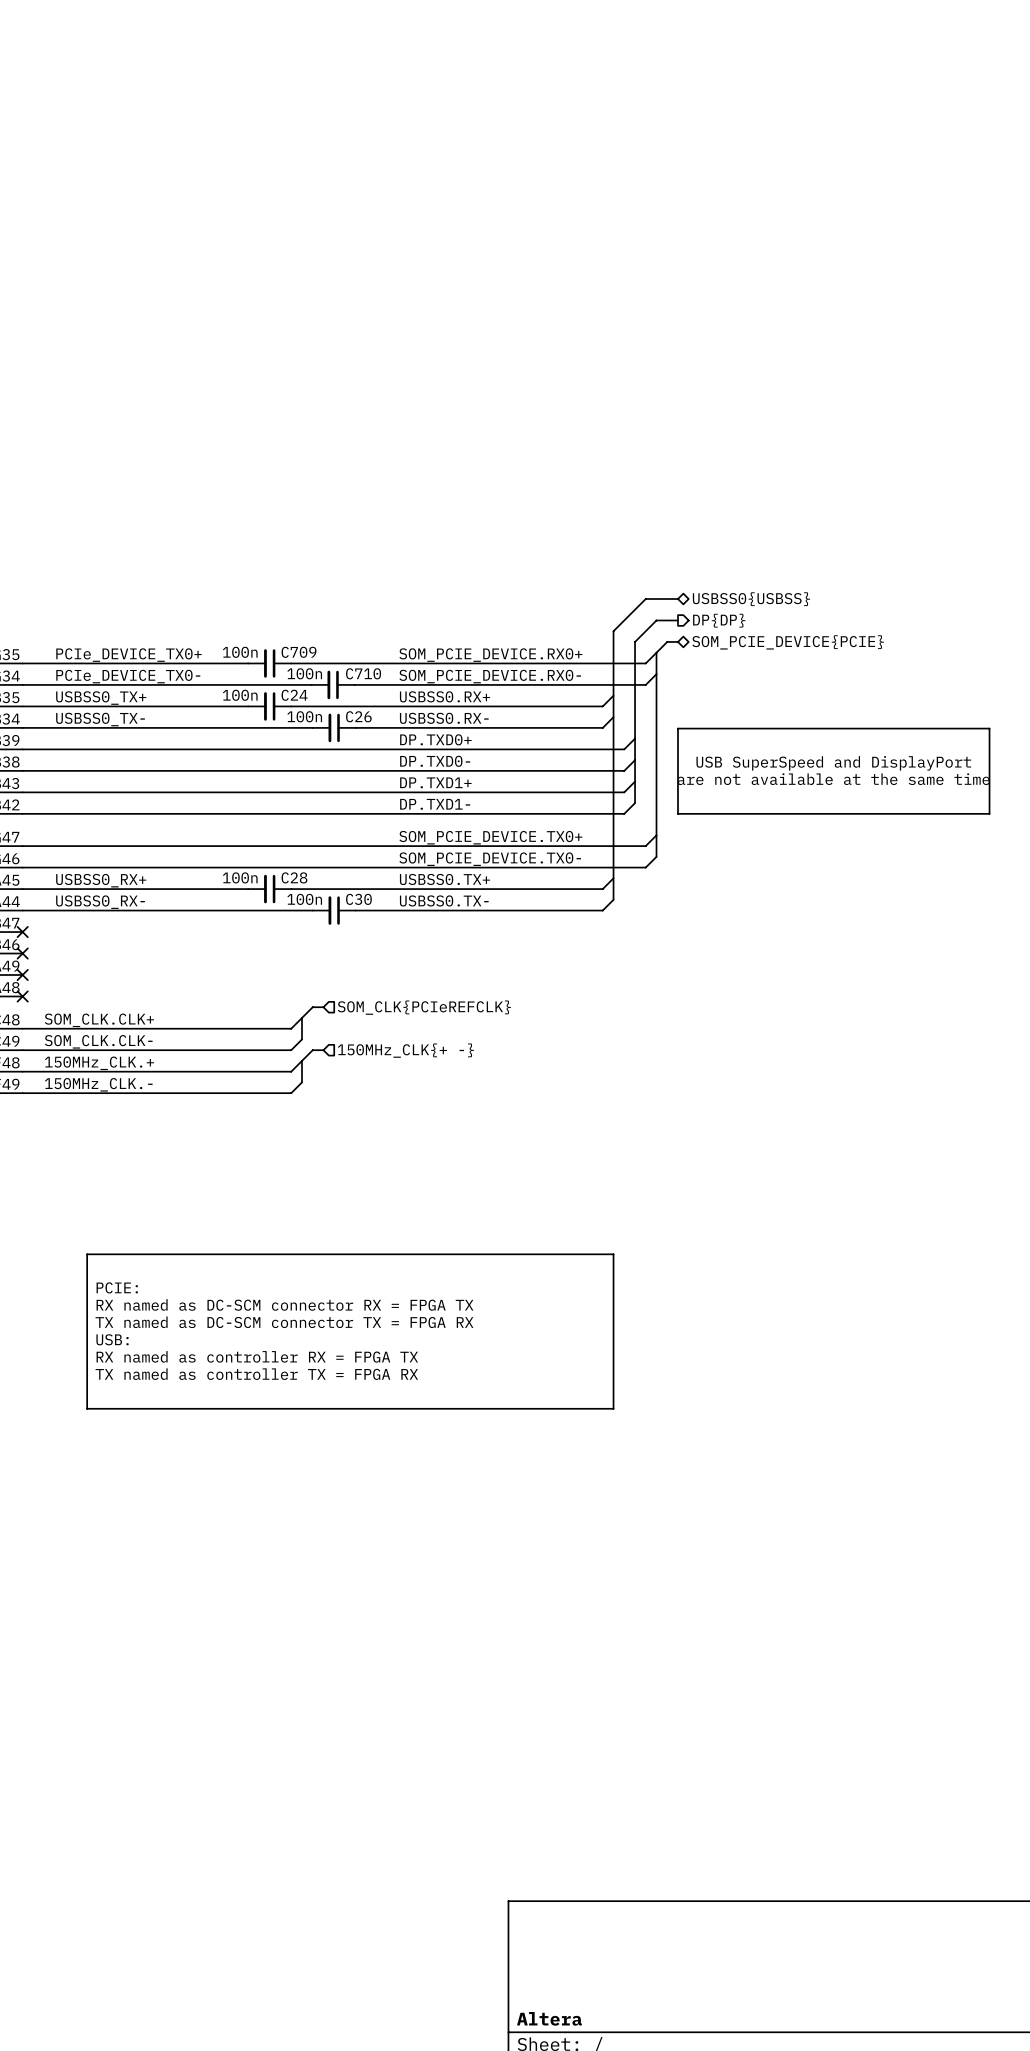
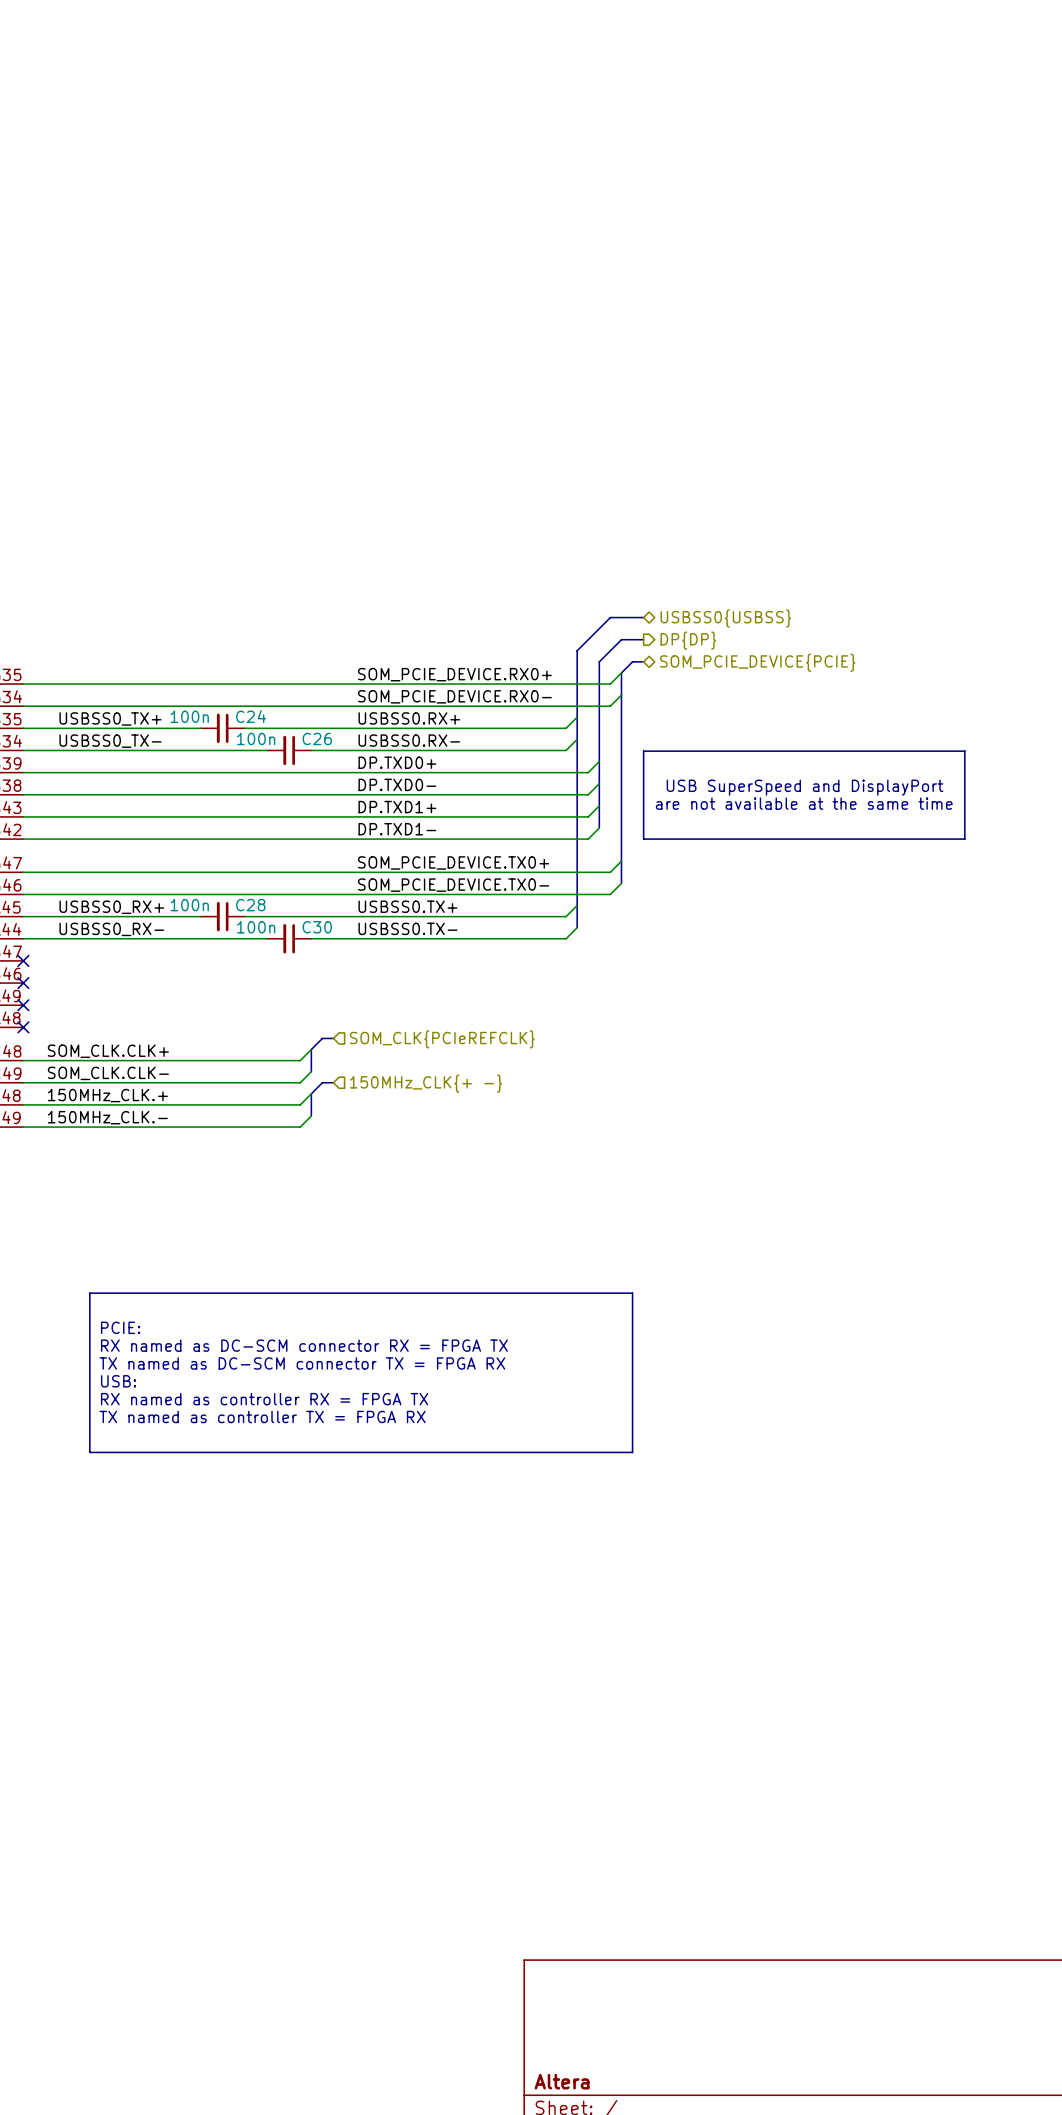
bus: (677, 599) (645, 599) (613, 631) (613, 899) -> (643, 617) (610, 617) (577, 650) (577, 927)
hierarchical label position: USBSS0{USBSS} (751, 599) -> USBSS0{USBSS} (725, 618)
bus: (677, 620) (656, 620) (635, 641) (635, 803) -> (643, 639) (621, 639) (599, 661) (599, 828)
hierarchical label position: DP{DP} (719, 620) -> DP{DP} (688, 640)
bus: (677, 641) (667, 641) (656, 652) (656, 856) -> (643, 661) (632, 661) (621, 672) (621, 883)
hierarchical label position: SOM_PCIE_DEVICE{PCIE} (788, 642) -> SOM_PCIE_DEVICE{PCIE} (757, 662)
wire: (656, 652) (645, 663) (592, 663) -> (621, 672) (610, 684)
label: PCIe_DEVICE_TX0+ (129, 655) -> none
label position: SOM_PCIE_DEVICE.RX0+ (490, 655) -> SOM_PCIE_DEVICE.RX0+ (454, 674)
C709: (269, 663) -> none
wire: (656, 674) (645, 684) (592, 684) -> (621, 695) (610, 706)
label: PCIe_DEVICE_TX0- (128, 676) -> none
label position: SOM_PCIE_DEVICE.RX0- (490, 676) -> SOM_PCIE_DEVICE.RX0- (454, 696)
C710: (333, 684) -> none
wire: (613, 695) (602, 706) (549, 706) -> (577, 717) (566, 728)
label position: USBSS0.RX+ (444, 696) -> USBSS0.RX+ (409, 718)
C24 position: (269, 706) -> (222, 728)
wire: (613, 717) (602, 727) (549, 727) -> (577, 739) (566, 750)
label position: USBSS0.RX- (444, 718) -> USBSS0.RX- (409, 740)
C26 position: (334, 727) -> (289, 750)
line: (677, 728) (677, 813) -> (699, 751) (643, 751) (643, 839) (699, 839)
line: (935, 728) (989, 728) (989, 813) (935, 813) -> (964, 751) (964, 839)
wire: (635, 738) (624, 749) (570, 749) -> (599, 761) (588, 772)
label position: DP.TXD0+ (435, 739) -> DP.TXD0+ (397, 762)
wire: (635, 760) (624, 770) (570, 770) -> (599, 783) (588, 794)
label position: DP.TXD0- (435, 761) -> DP.TXD0- (397, 784)
text position: USB SuperSpeed and DisplayPort (833, 763) -> USB SuperSpeed and DisplayPort (805, 787)
text position: are not available at the same time (833, 779) -> are not available at the same time (804, 803)
wire: (635, 781) (624, 792) (570, 792) -> (599, 805) (588, 816)
label position: DP.TXD1+ (435, 782) -> DP.TXD1+ (397, 807)
wire: (635, 803) (624, 813) (570, 813) -> (599, 828) (588, 839)
label position: DP.TXD1- (435, 804) -> DP.TXD1- (397, 829)
wire: (656, 835) (645, 846) (592, 846) -> (621, 861) (610, 872)
label position: SOM_PCIE_DEVICE.TX0+ (490, 837) -> SOM_PCIE_DEVICE.TX0+ (453, 862)
wire: (656, 856) (645, 867) (592, 867) -> (621, 883) (610, 894)
label position: SOM_PCIE_DEVICE.TX0- (490, 859) -> SOM_PCIE_DEVICE.TX0- (453, 885)
wire: (613, 878) (602, 889) (549, 889) -> (577, 905) (566, 916)
label position: USBSS0.TX+ (444, 879) -> USBSS0.TX+ (407, 906)
C28 position: (269, 889) -> (222, 916)
wire: (613, 899) (602, 910) (549, 910) -> (577, 927) (566, 938)
label position: USBSS0.TX- (444, 900) -> USBSS0.TX- (407, 928)
C30 position: (334, 910) -> (289, 938)

